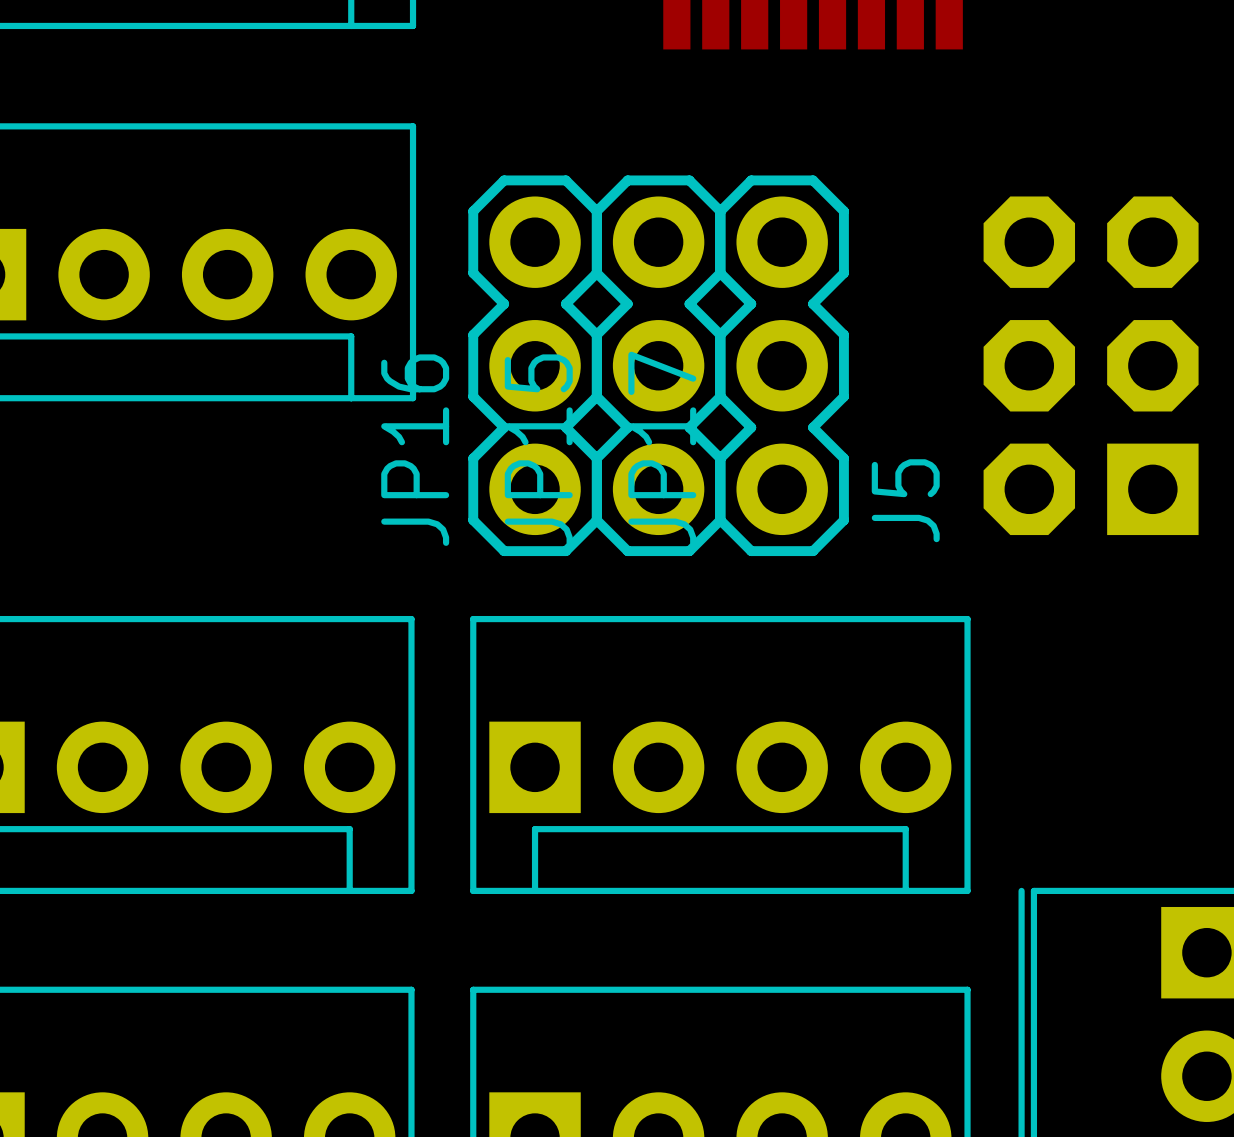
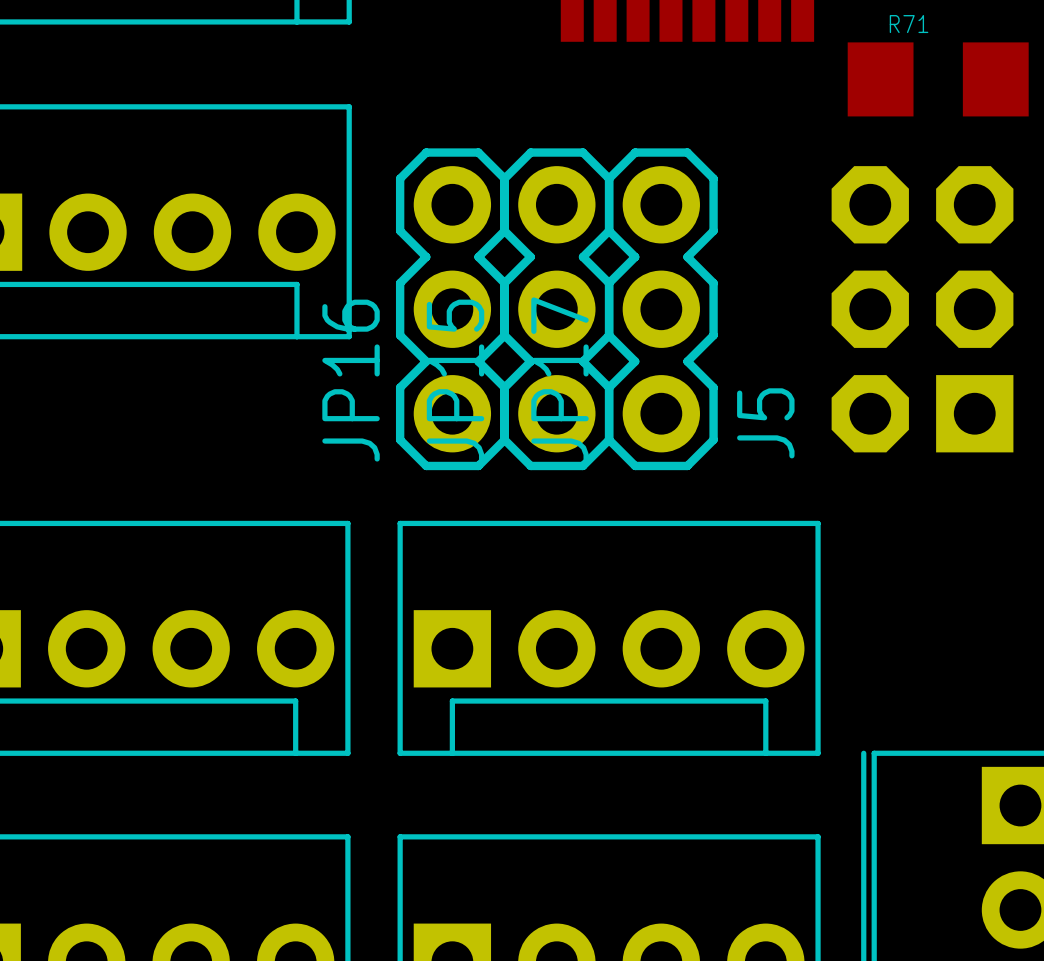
R71: none -> (938, 79)

